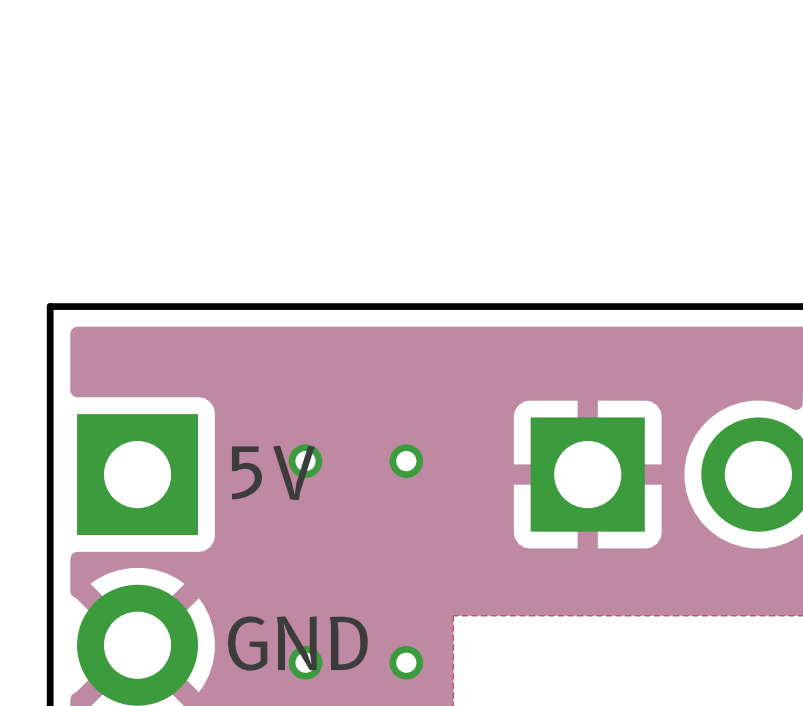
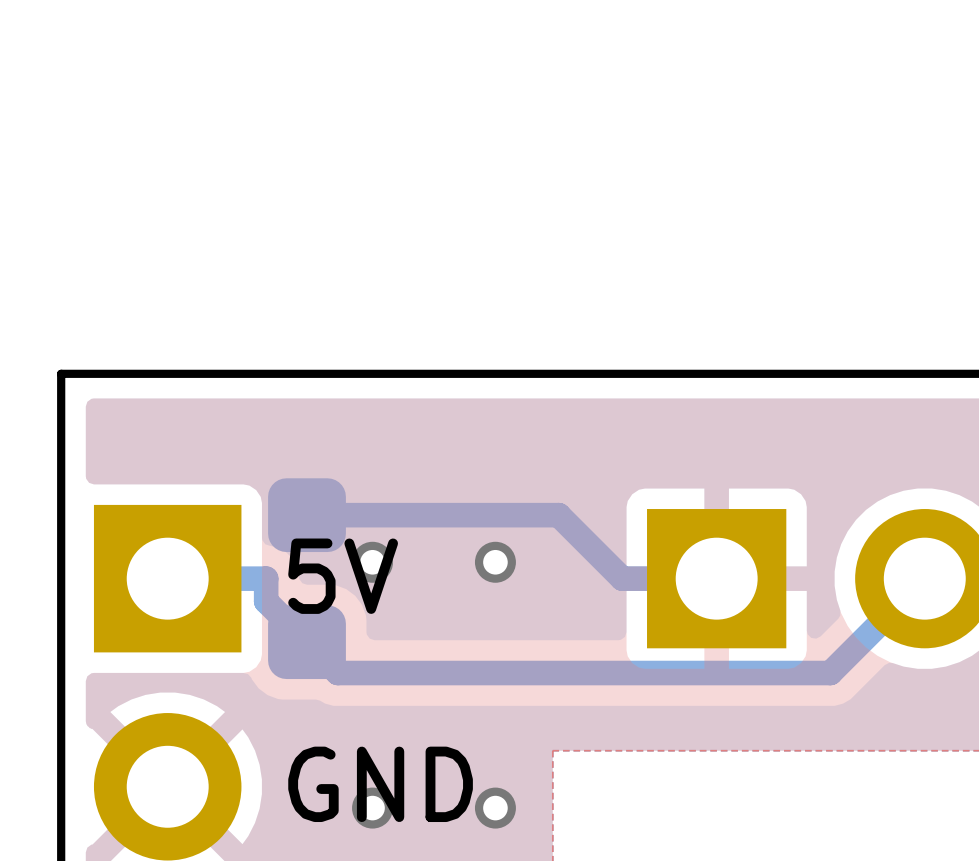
bottom track: none -> (306, 515) (558, 515) (622, 578) (716, 578)
bottom track: none -> (167, 578) (266, 578) (266, 601) (337, 673) (830, 673) (924, 578)
part: none -> (306, 578)

